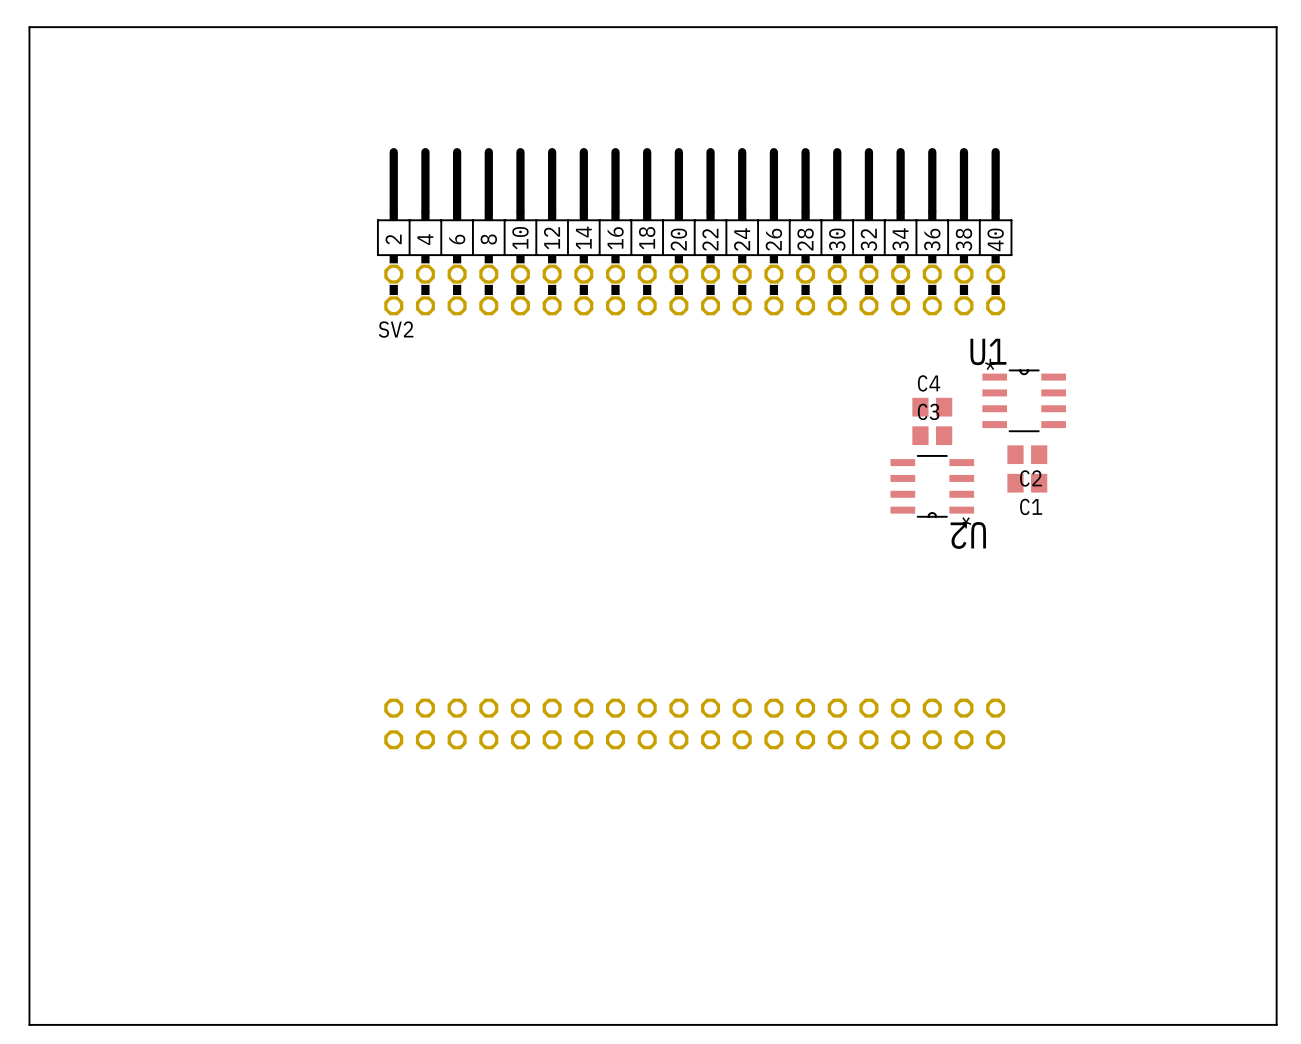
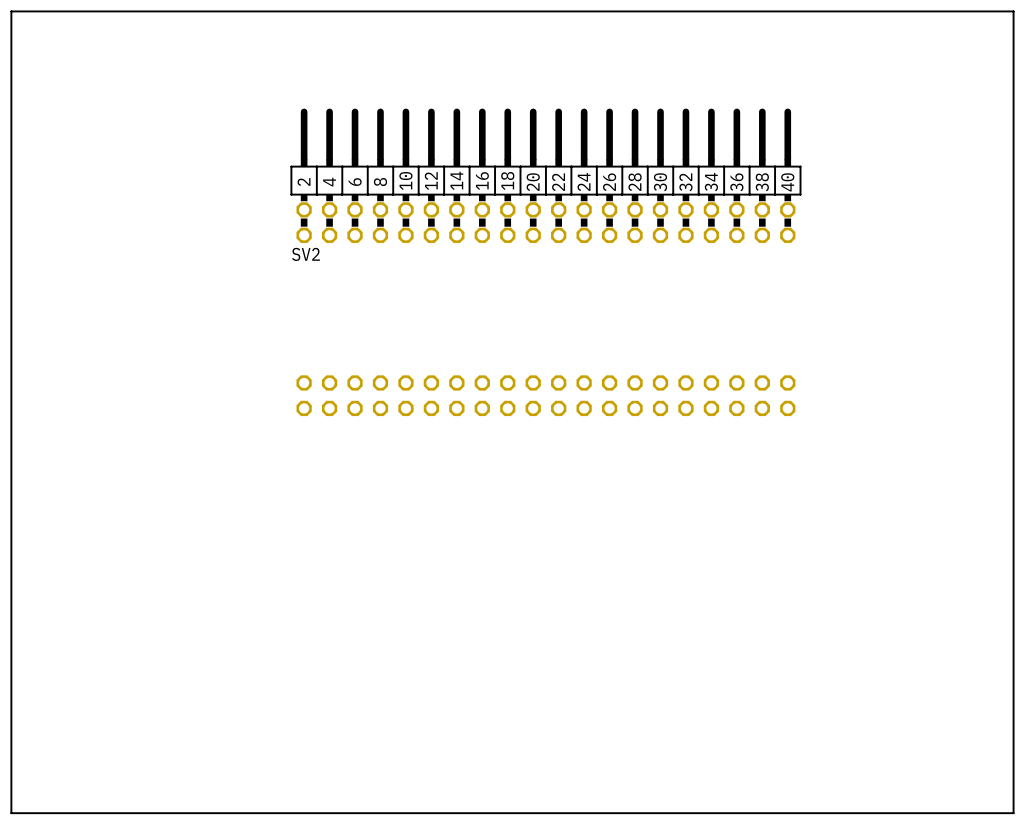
U1: (1024, 400) -> none
C4: (932, 407) -> none
C3: (932, 435) -> none
C2: (1027, 454) -> none
C1: (1027, 483) -> none
U2: (932, 486) -> none
part position: (694, 723) -> (545, 395)

